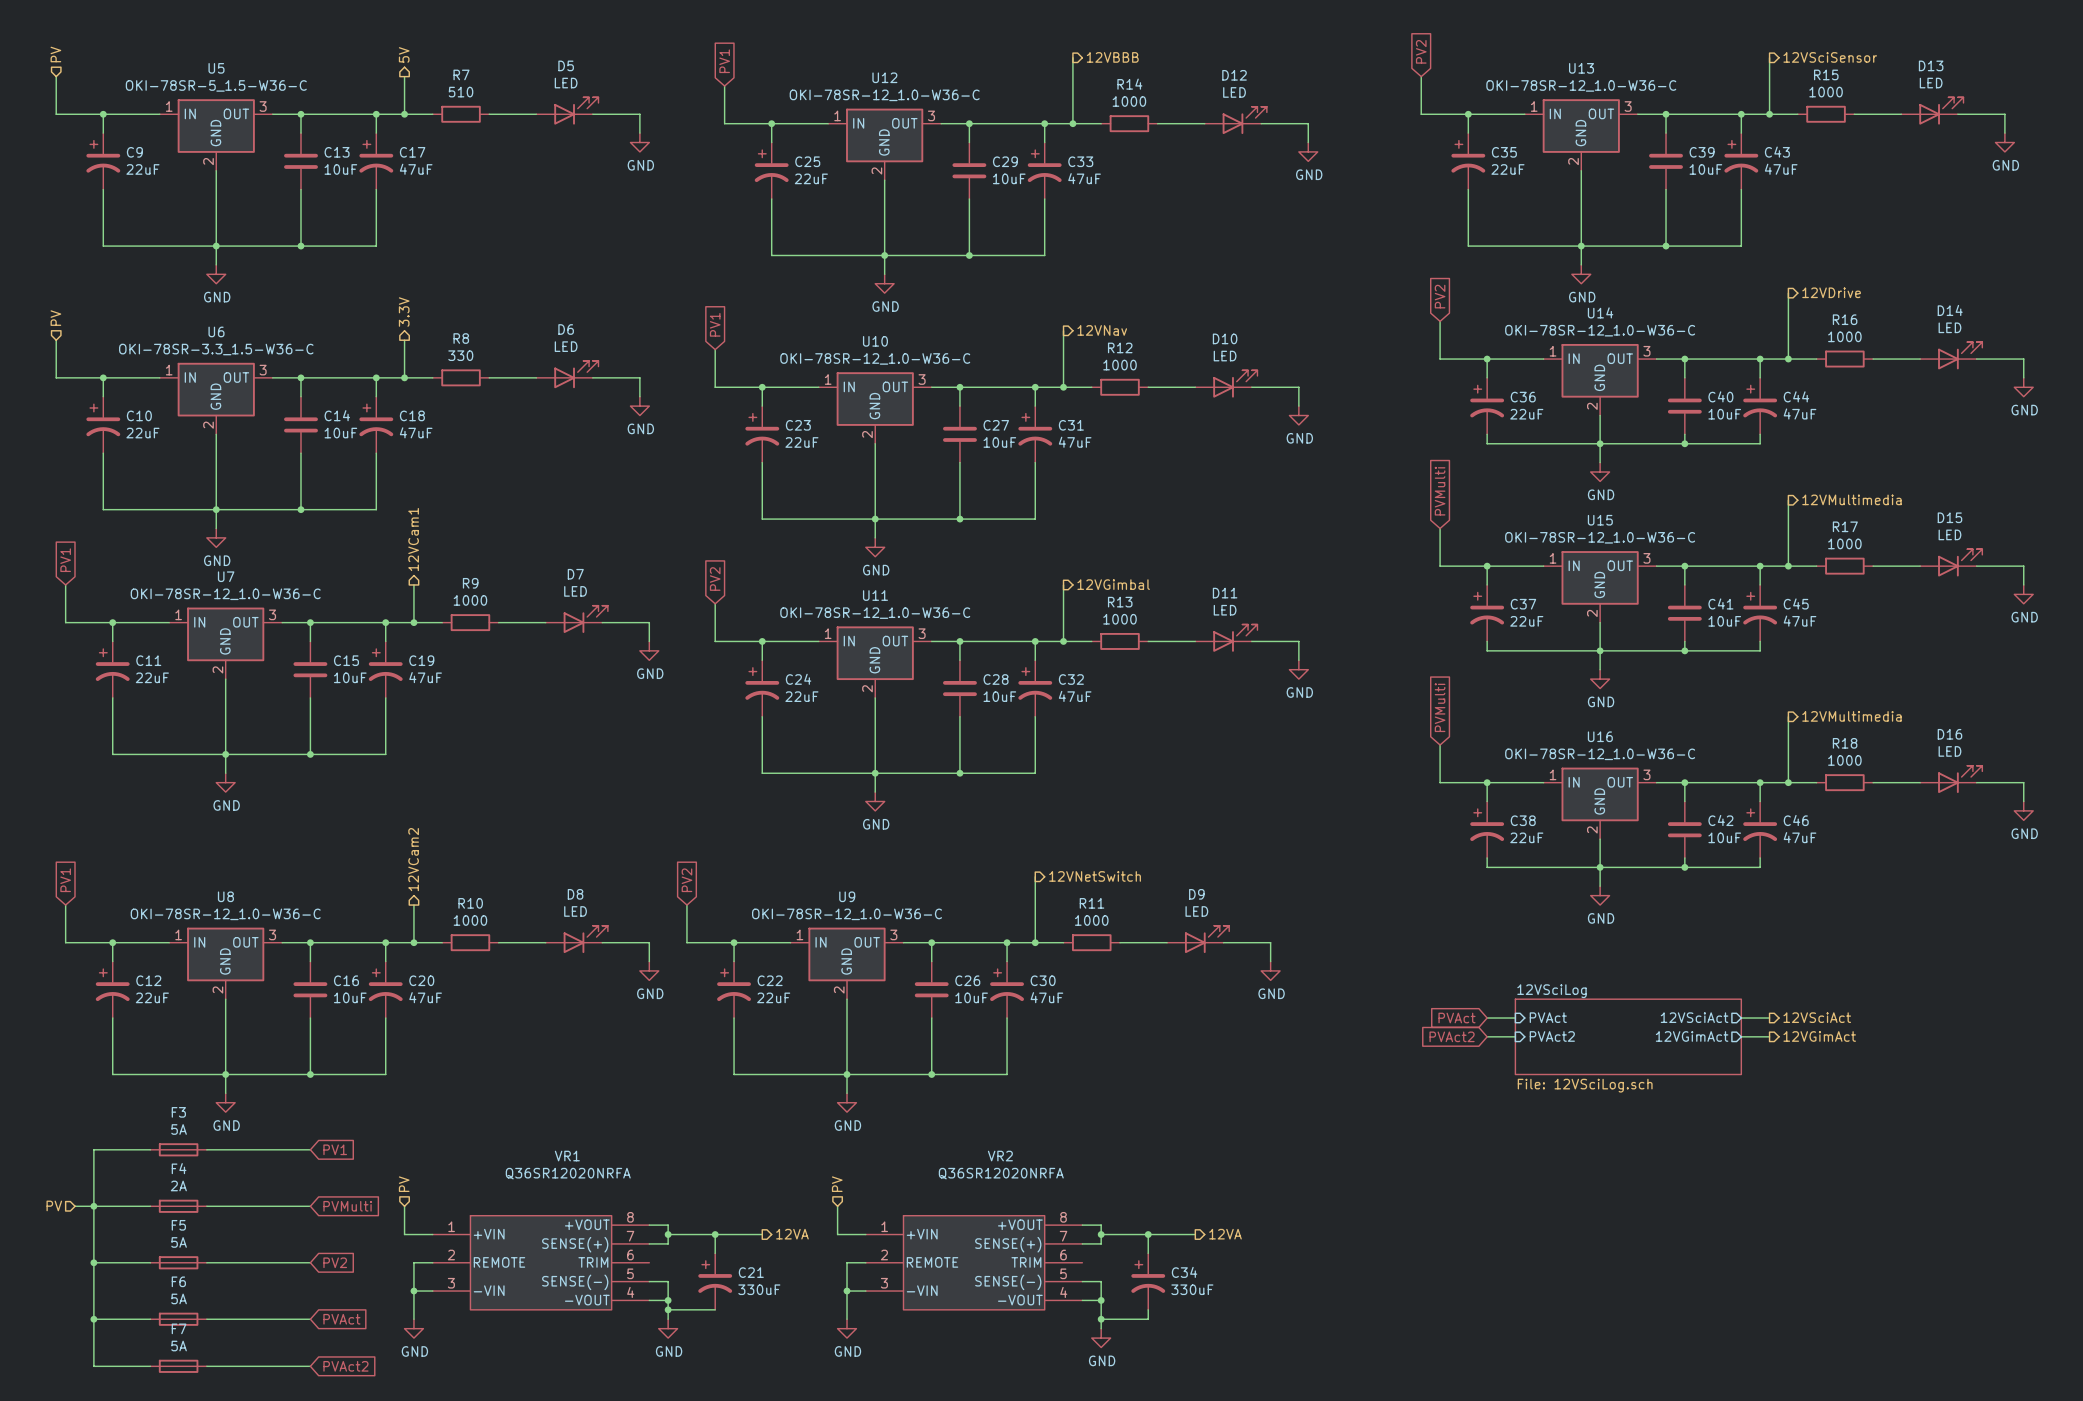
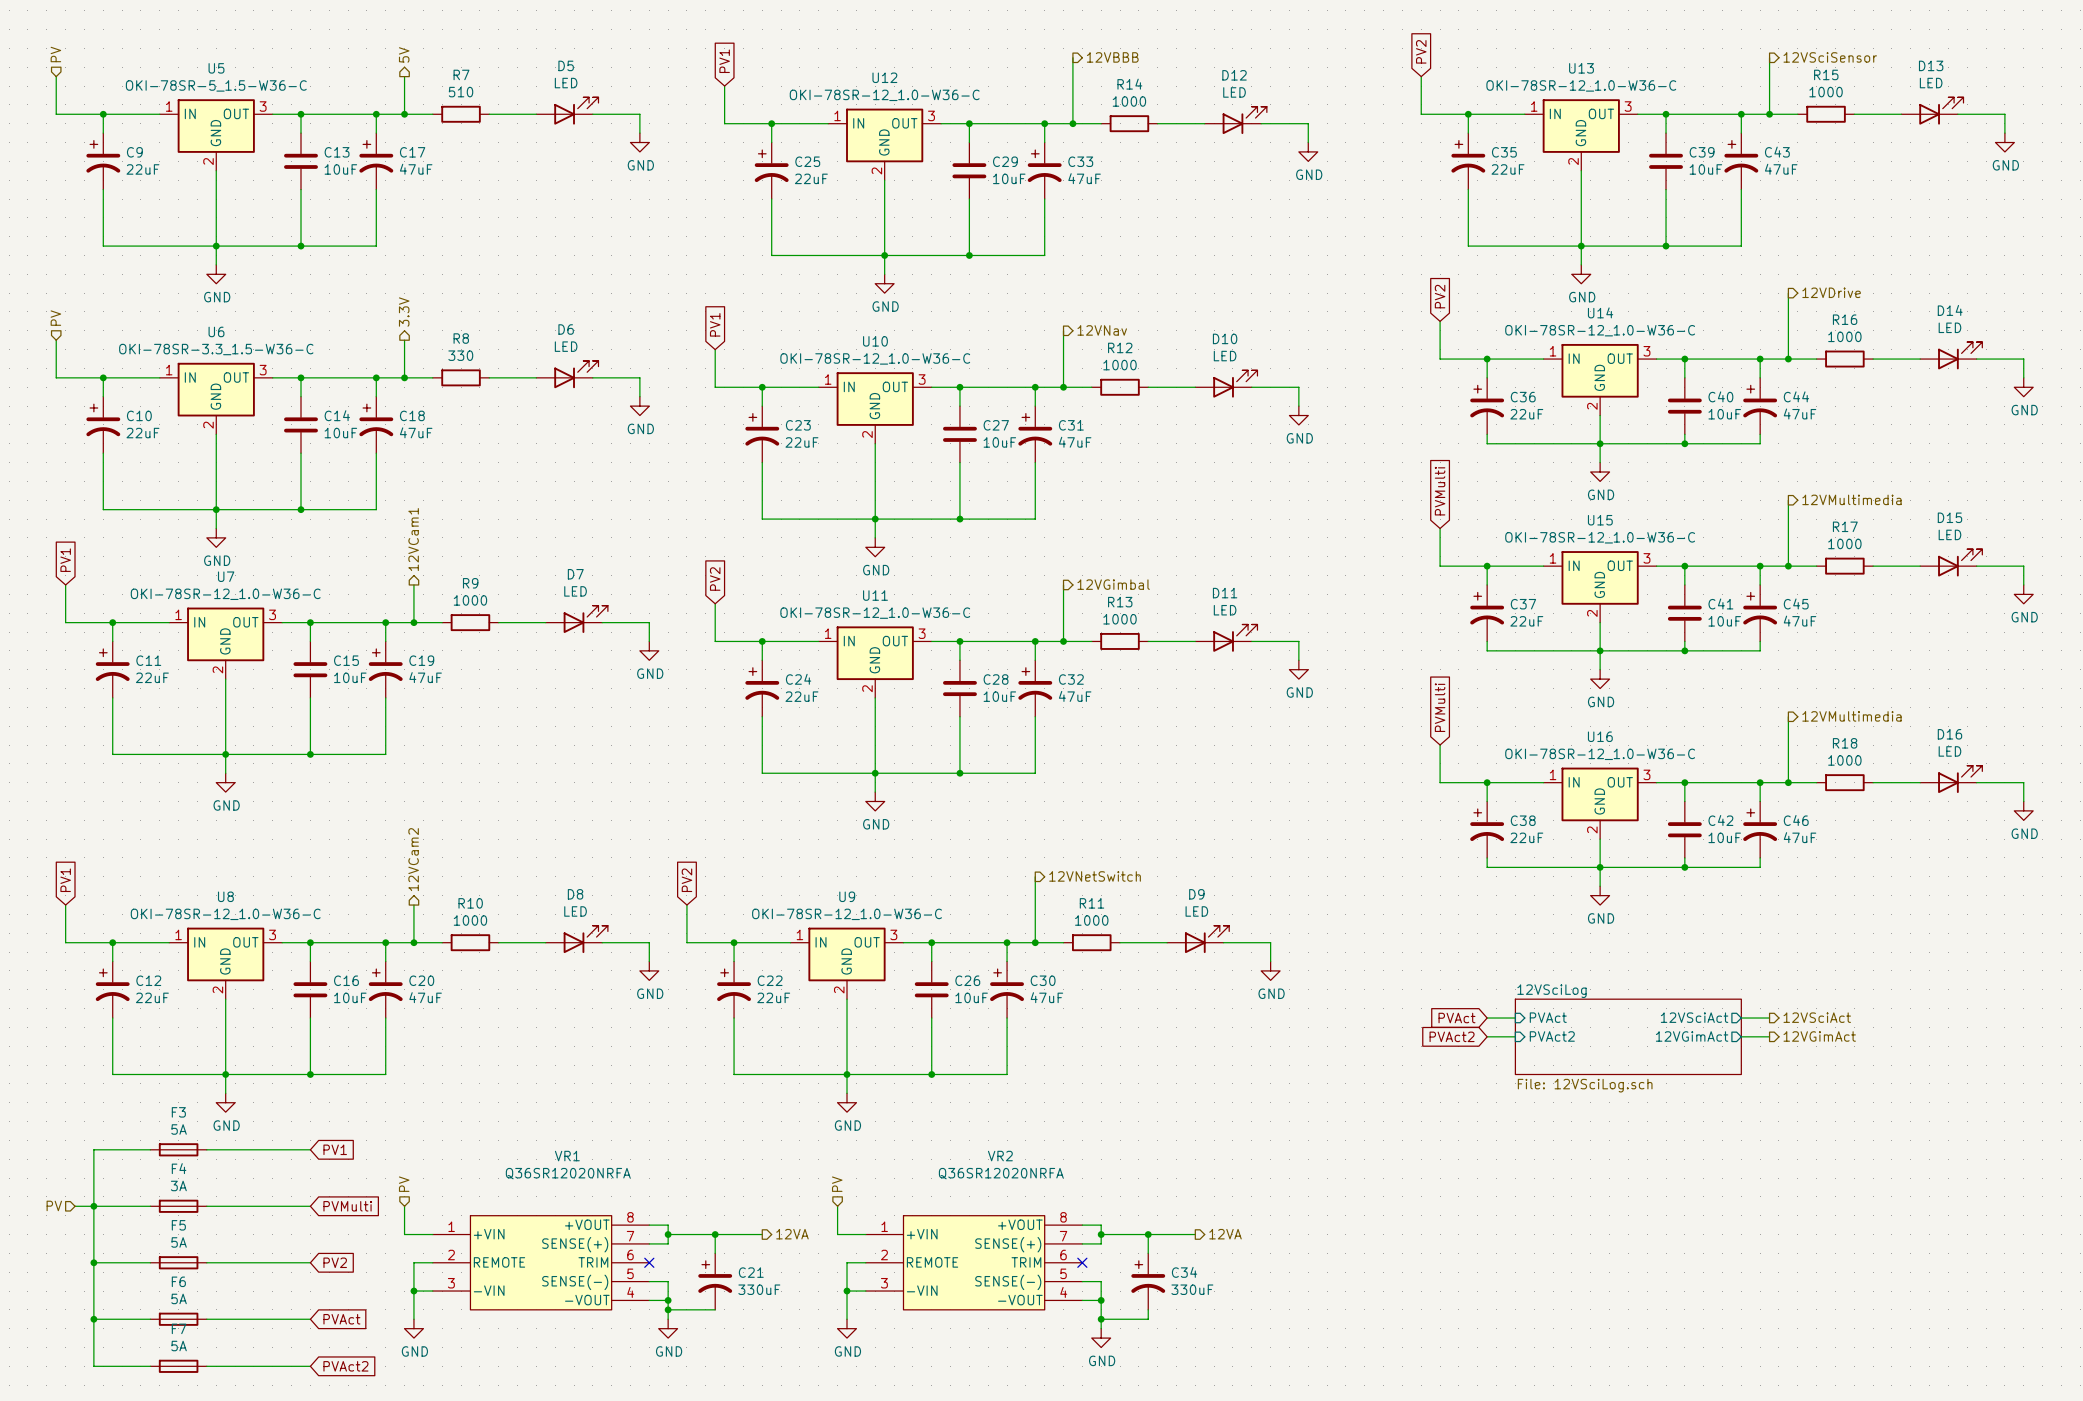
F4 value: 2A (178, 1185) -> 3A (178, 1185)
no-connect mark: none -> (649, 1262)
no-connect mark: none -> (1082, 1262)

